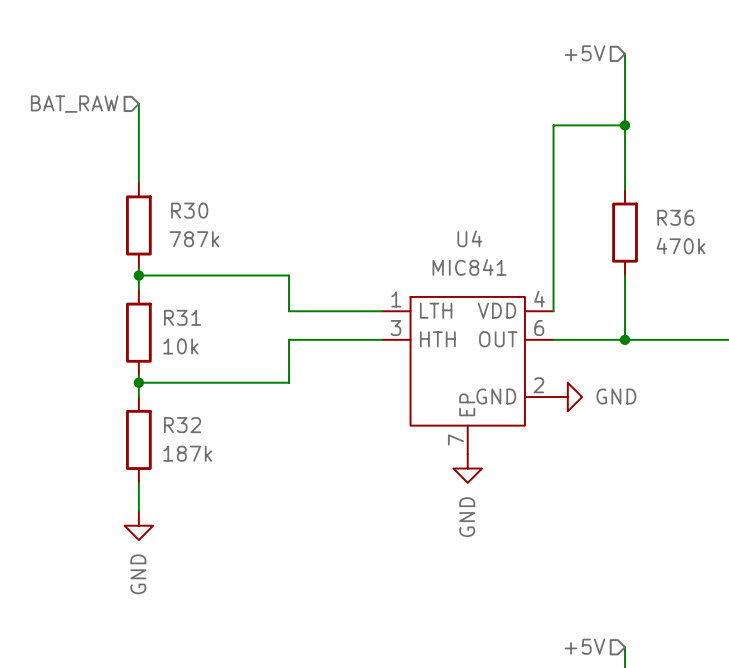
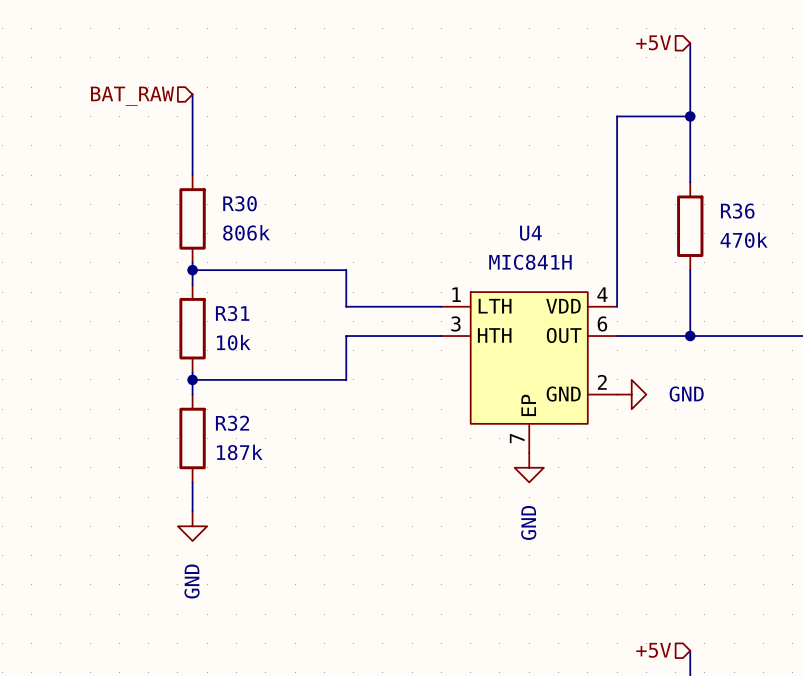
R30 value: 787k (194, 239) -> 806k (246, 232)
U4 value: MIC841 (469, 267) -> MIC841H (530, 262)

